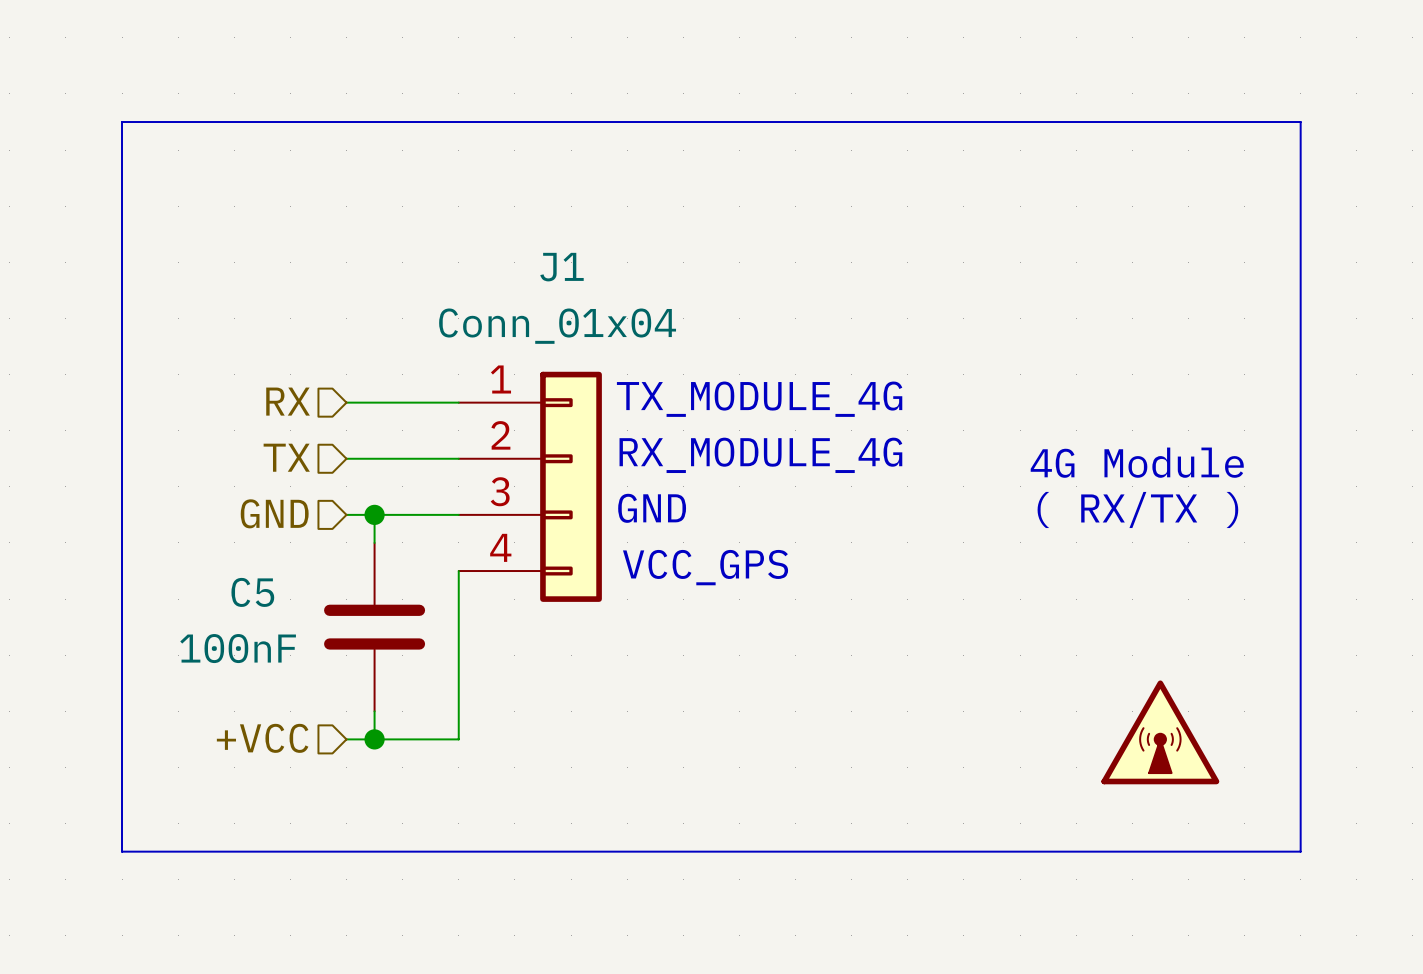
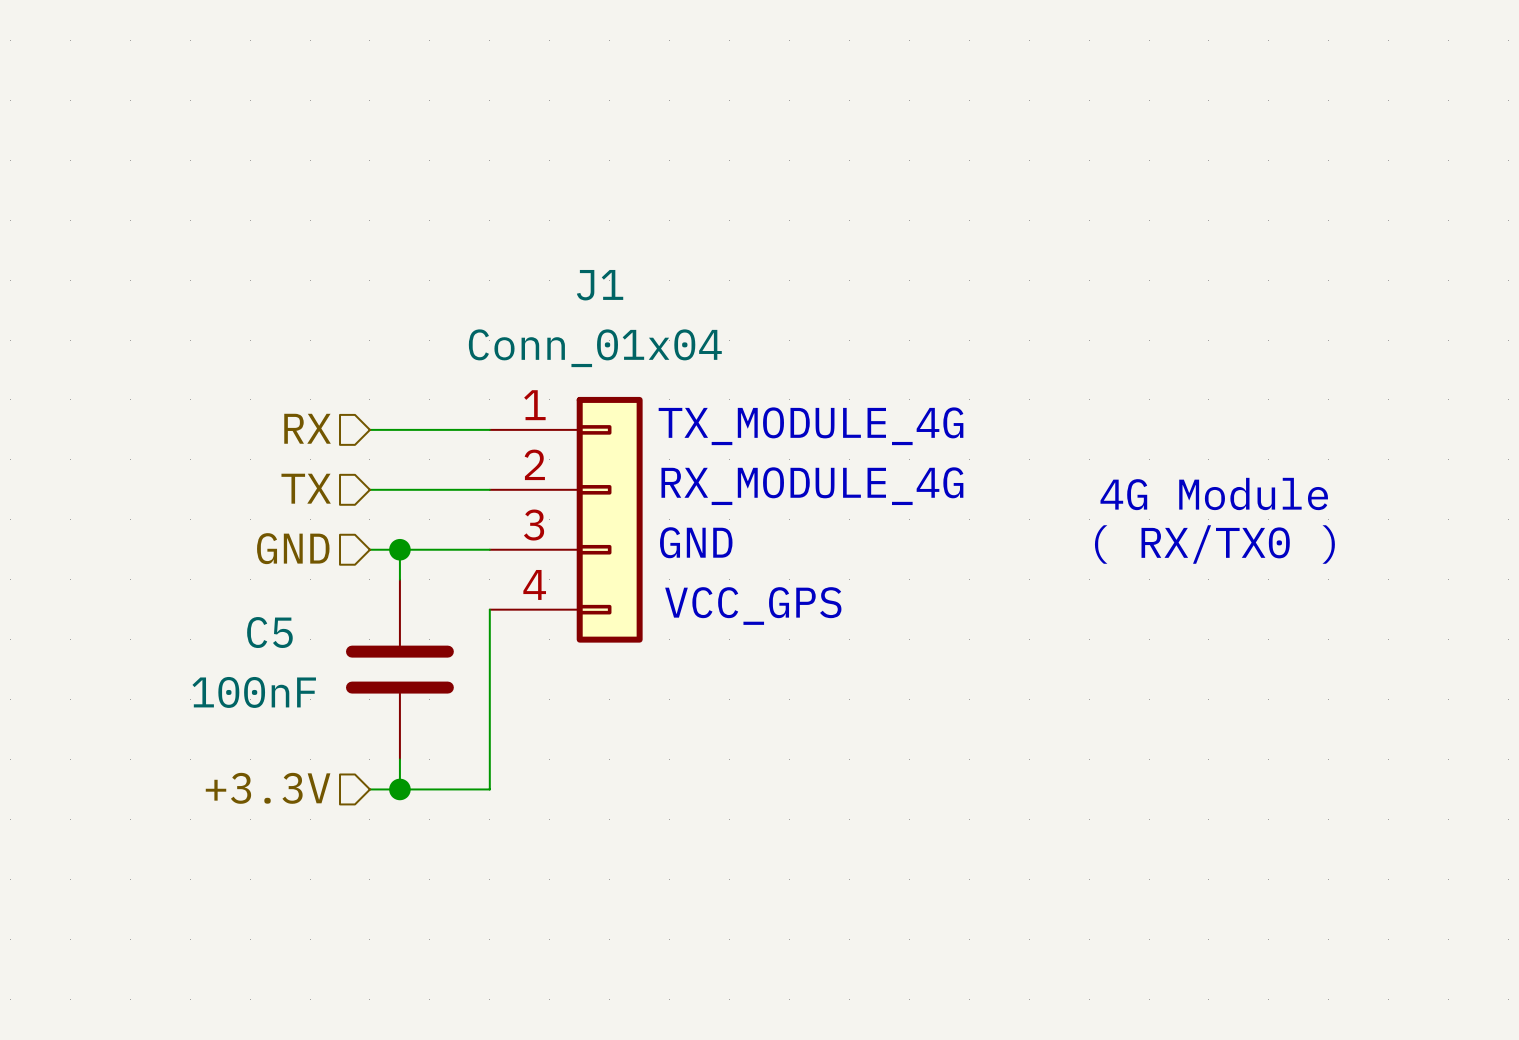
line: (122, 122) (1300, 122) (1300, 851) (122, 851) (122, 122) -> none
text: ( RX/TX ) (1137, 509) -> ( RX/TX0 ) (1214, 544)
power symbol: (1160, 732) -> none
hierarchical label: +VCC (262, 738) -> +3.3V (268, 788)

